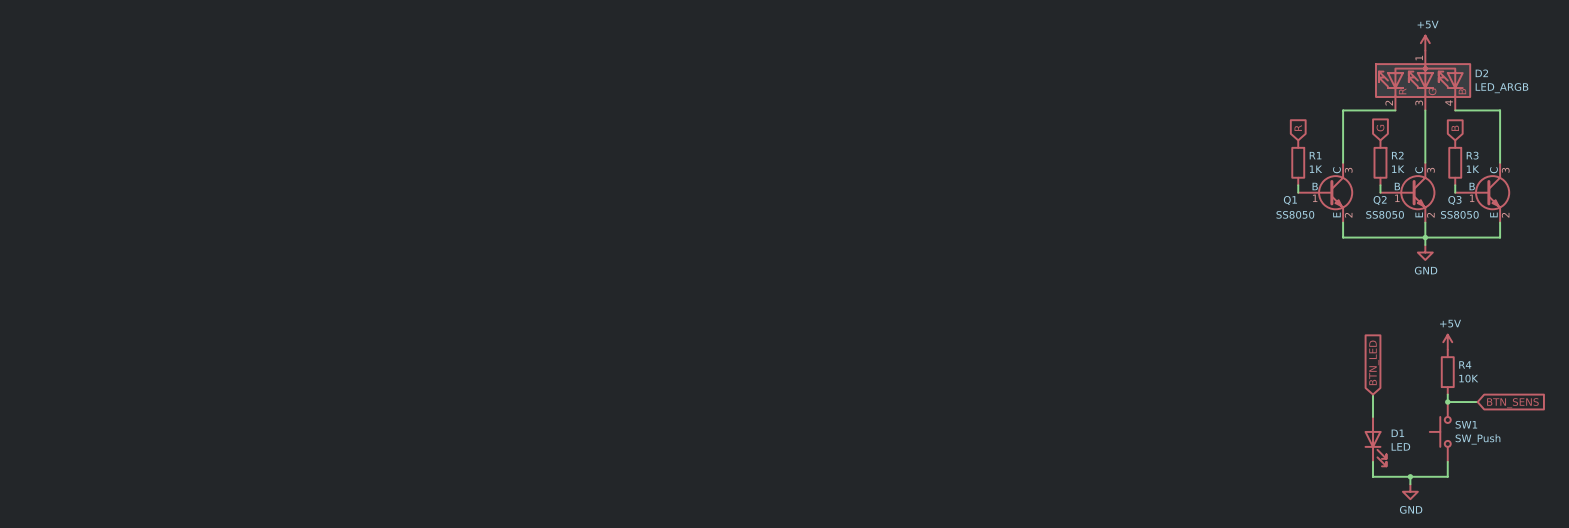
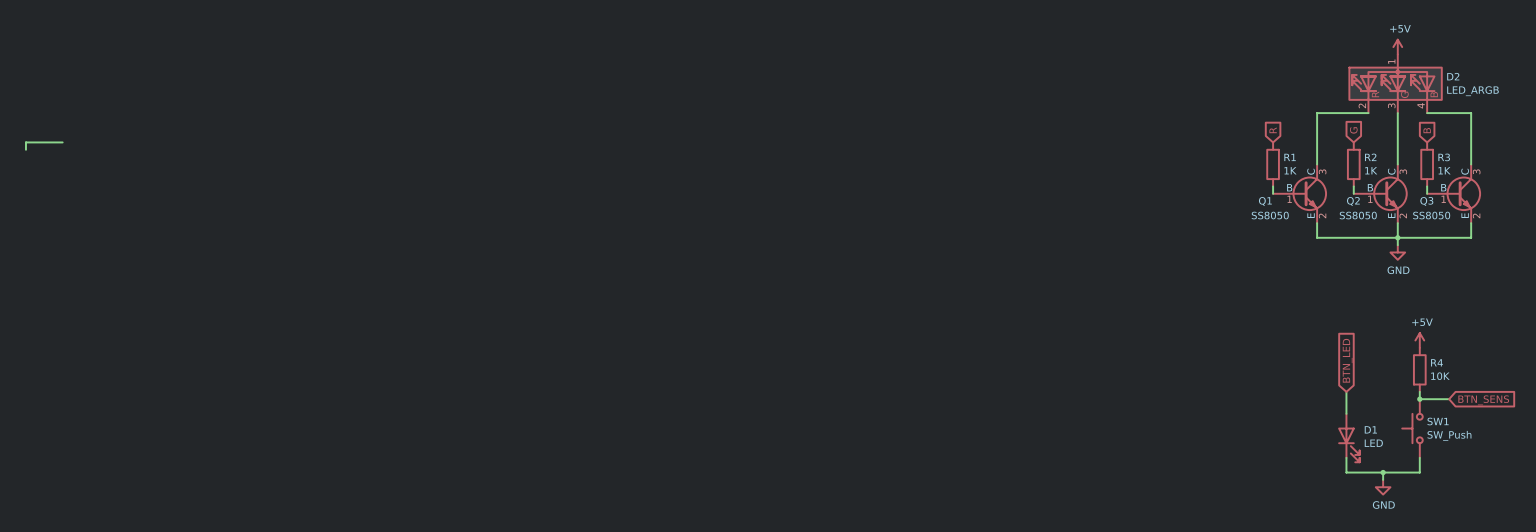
wire: none -> (62, 142) (25, 142) (25, 149)

